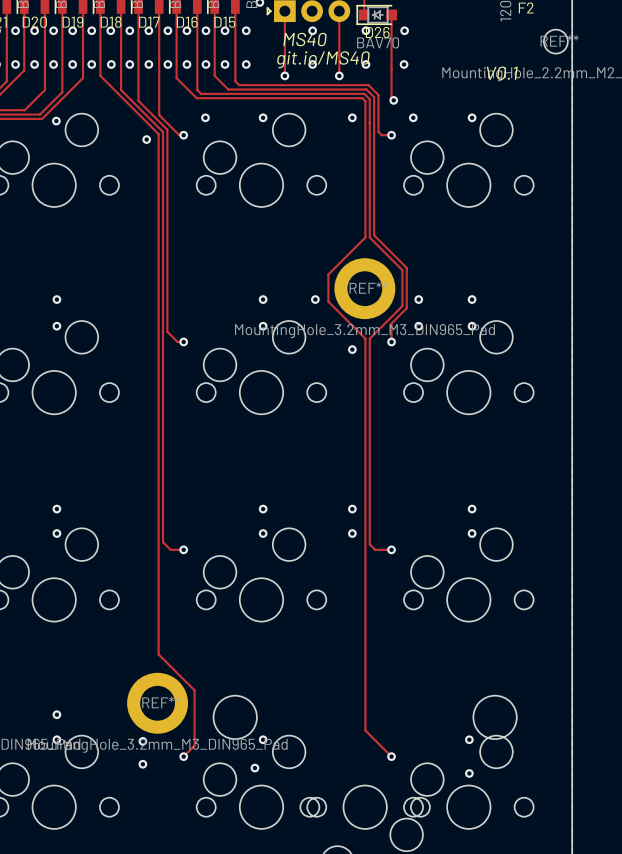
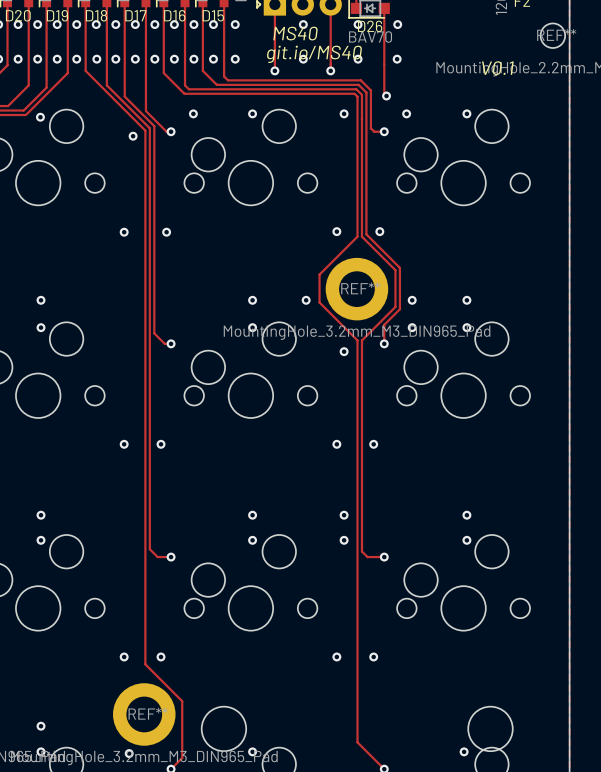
via: none -> (336, 231)
via: none -> (379, 231)
via: none -> (124, 232)
via: none -> (166, 232)
via: none -> (124, 444)
via: none -> (161, 444)
via: none -> (336, 444)
via: none -> (373, 444)
via: none -> (124, 656)
via: none -> (161, 656)
via: none -> (336, 656)
via: none -> (373, 656)

